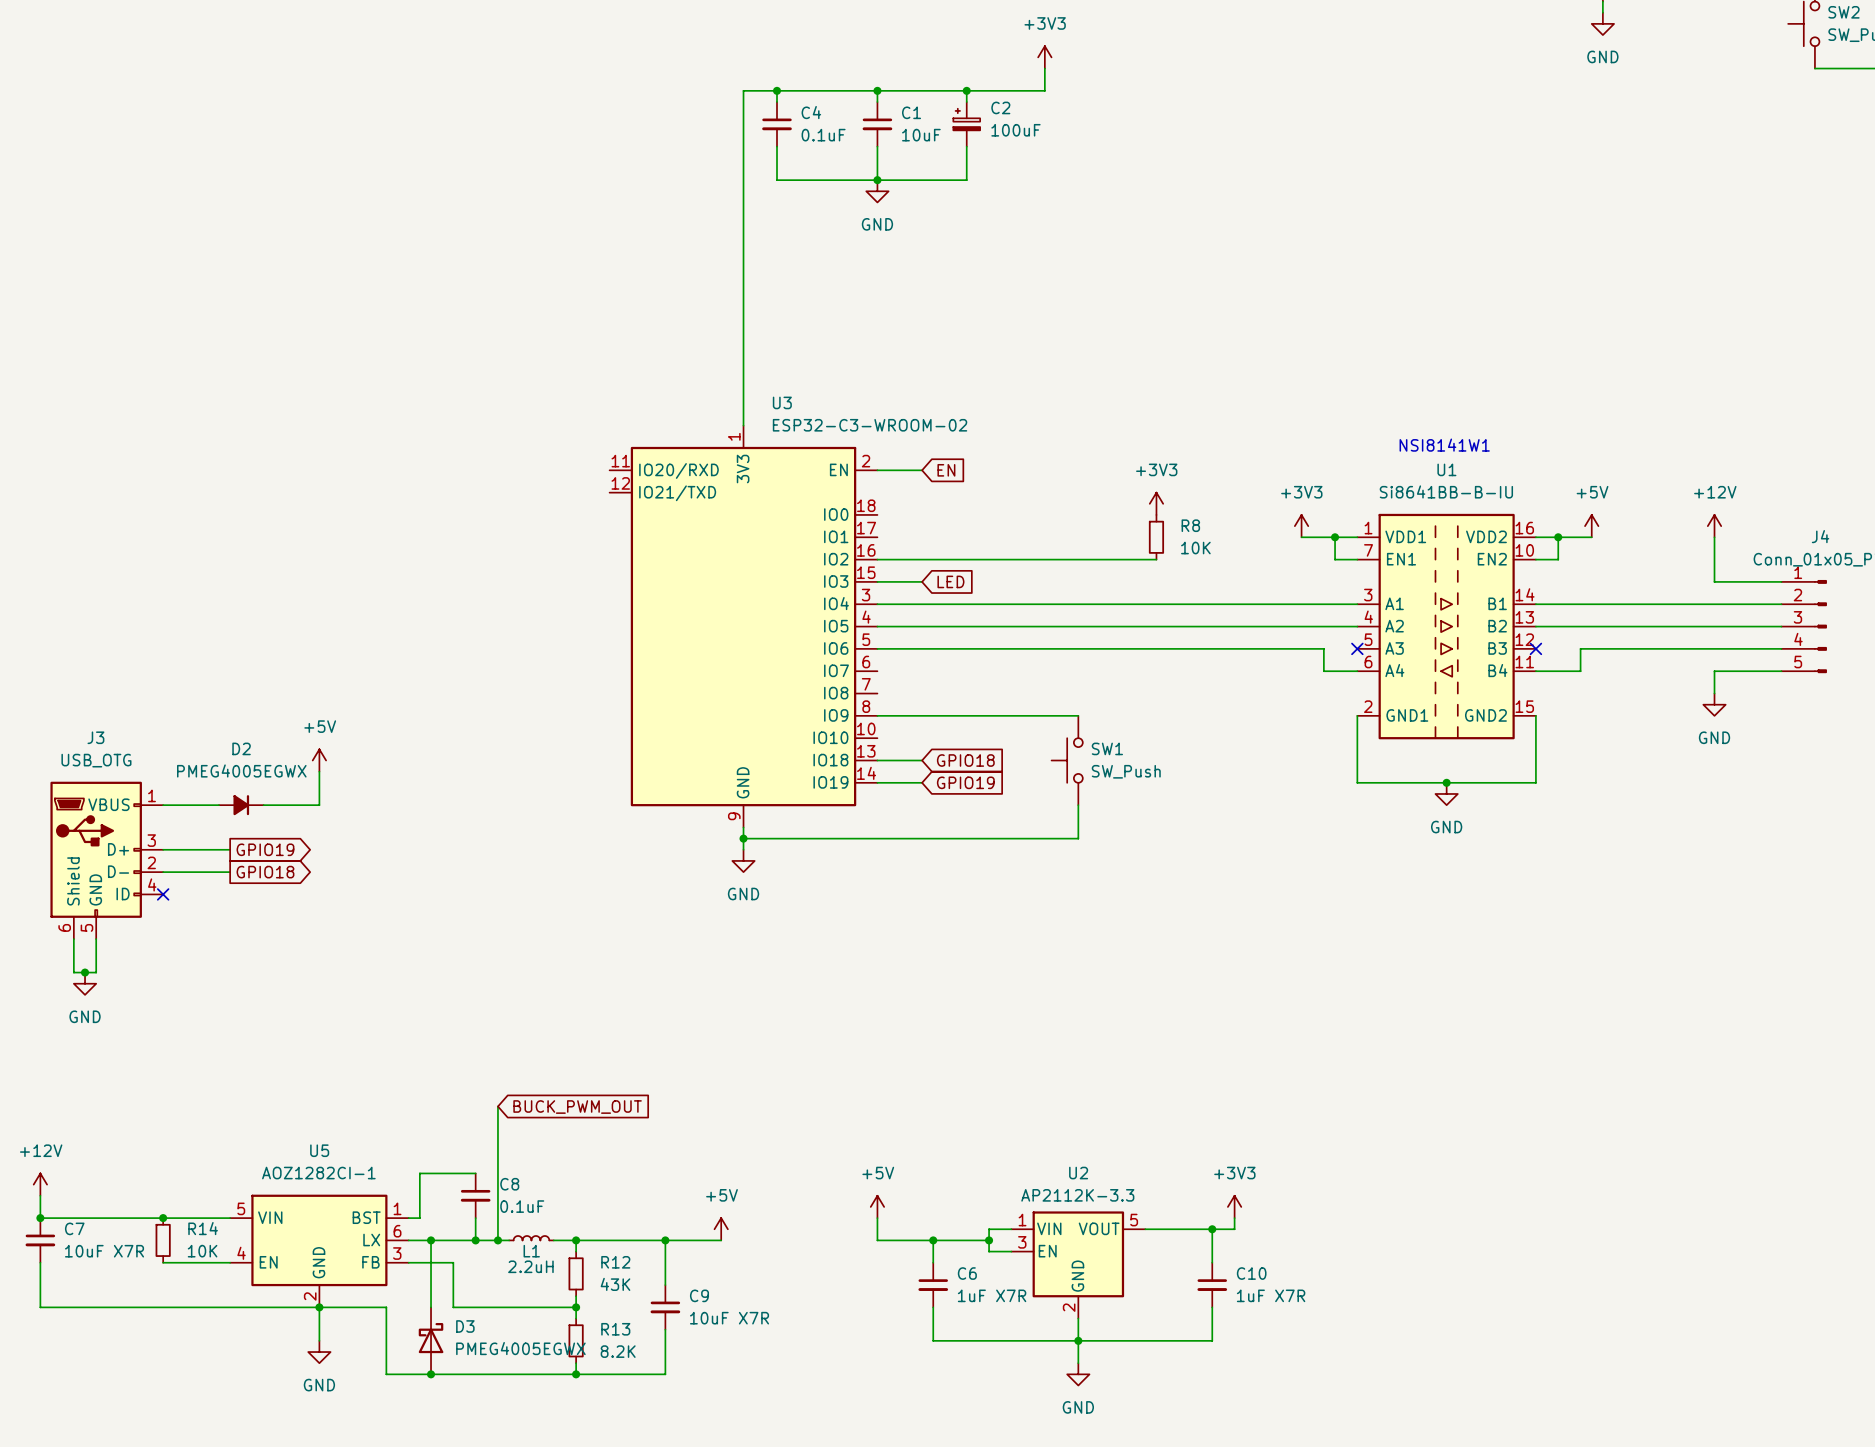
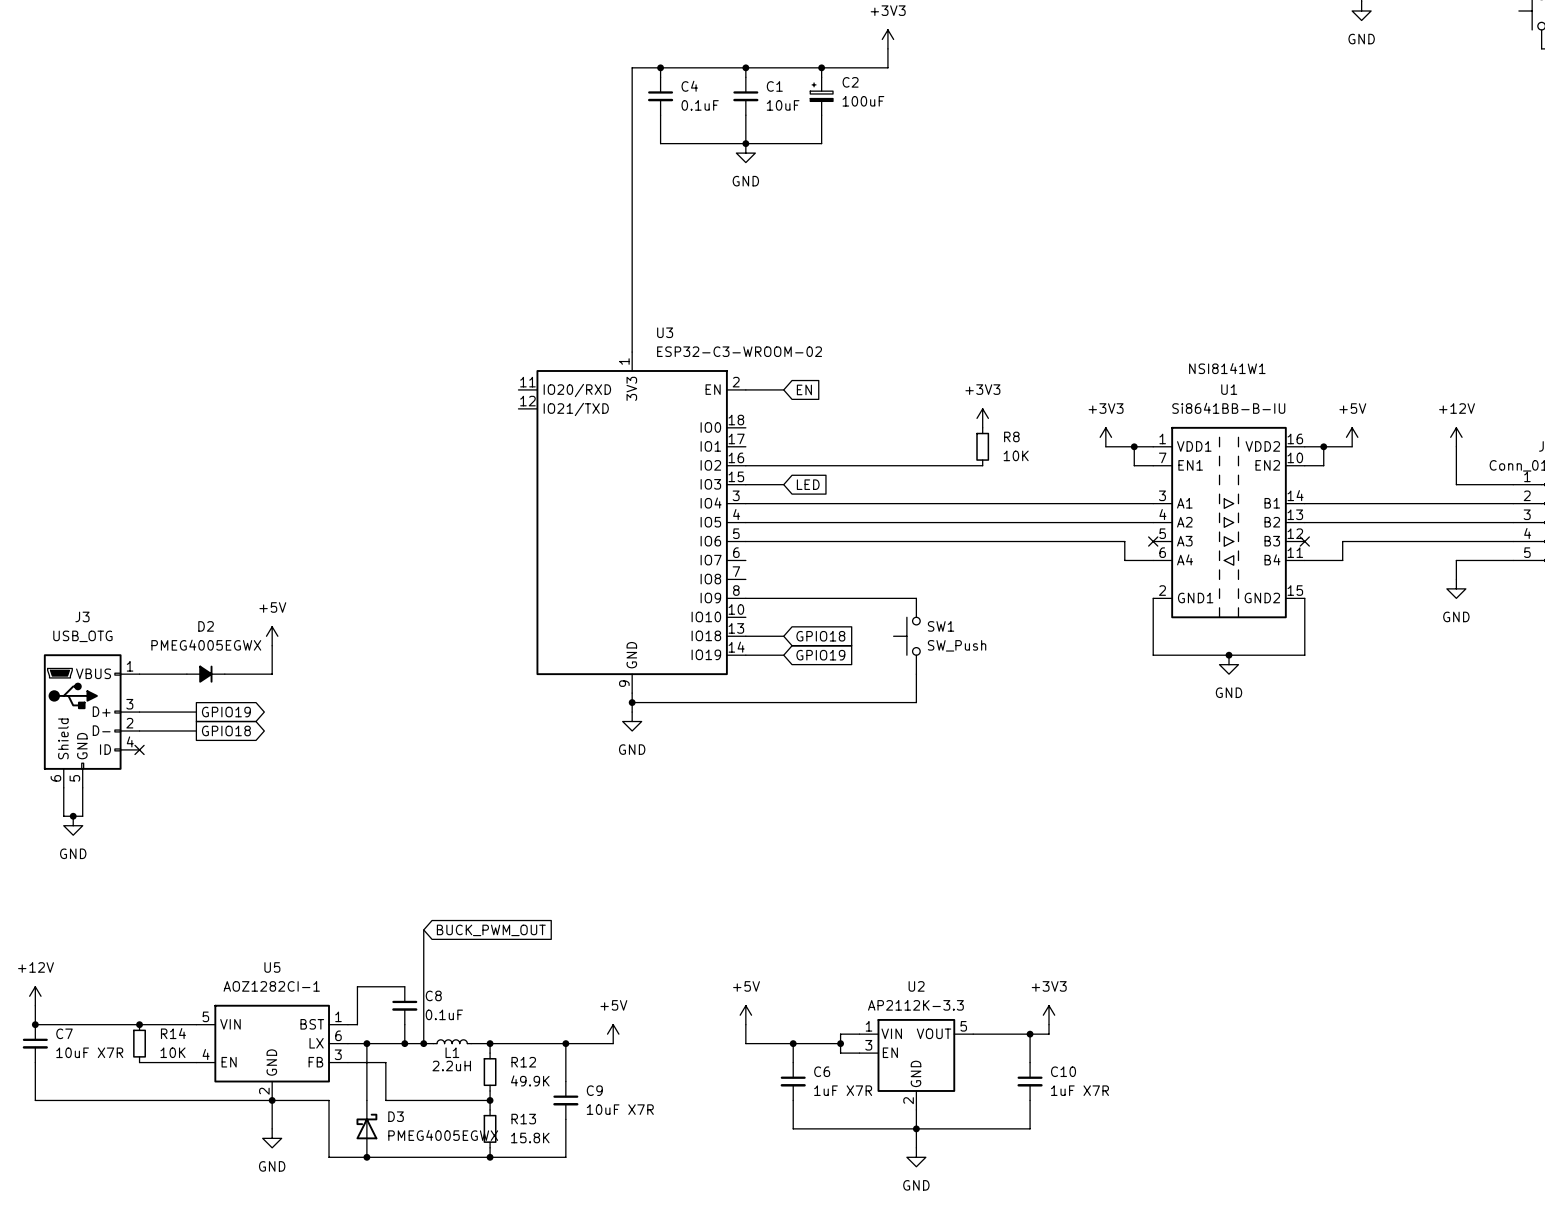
R12 value: 43K (615, 1284) -> 49.9K (530, 1080)
R13 value: 8.2K (618, 1351) -> 15.8K (530, 1138)

